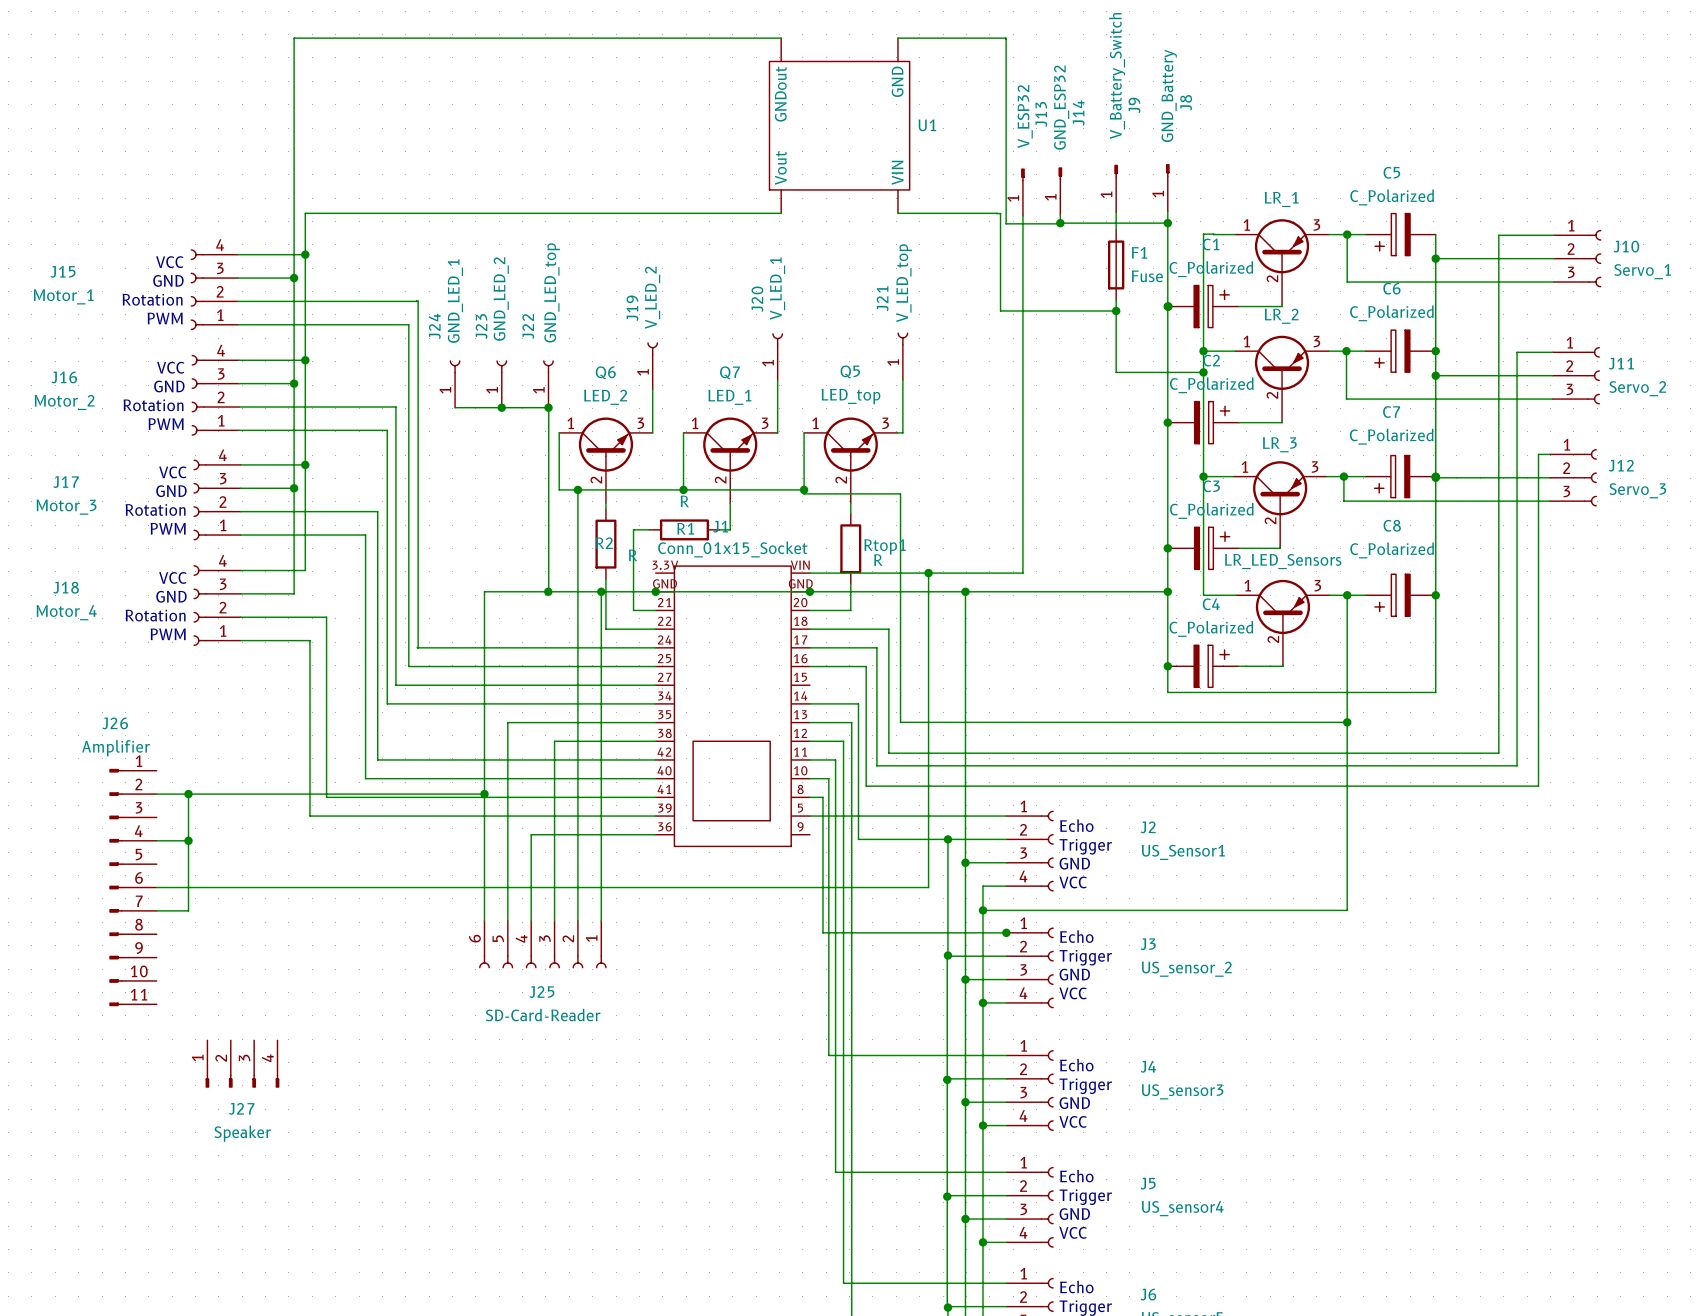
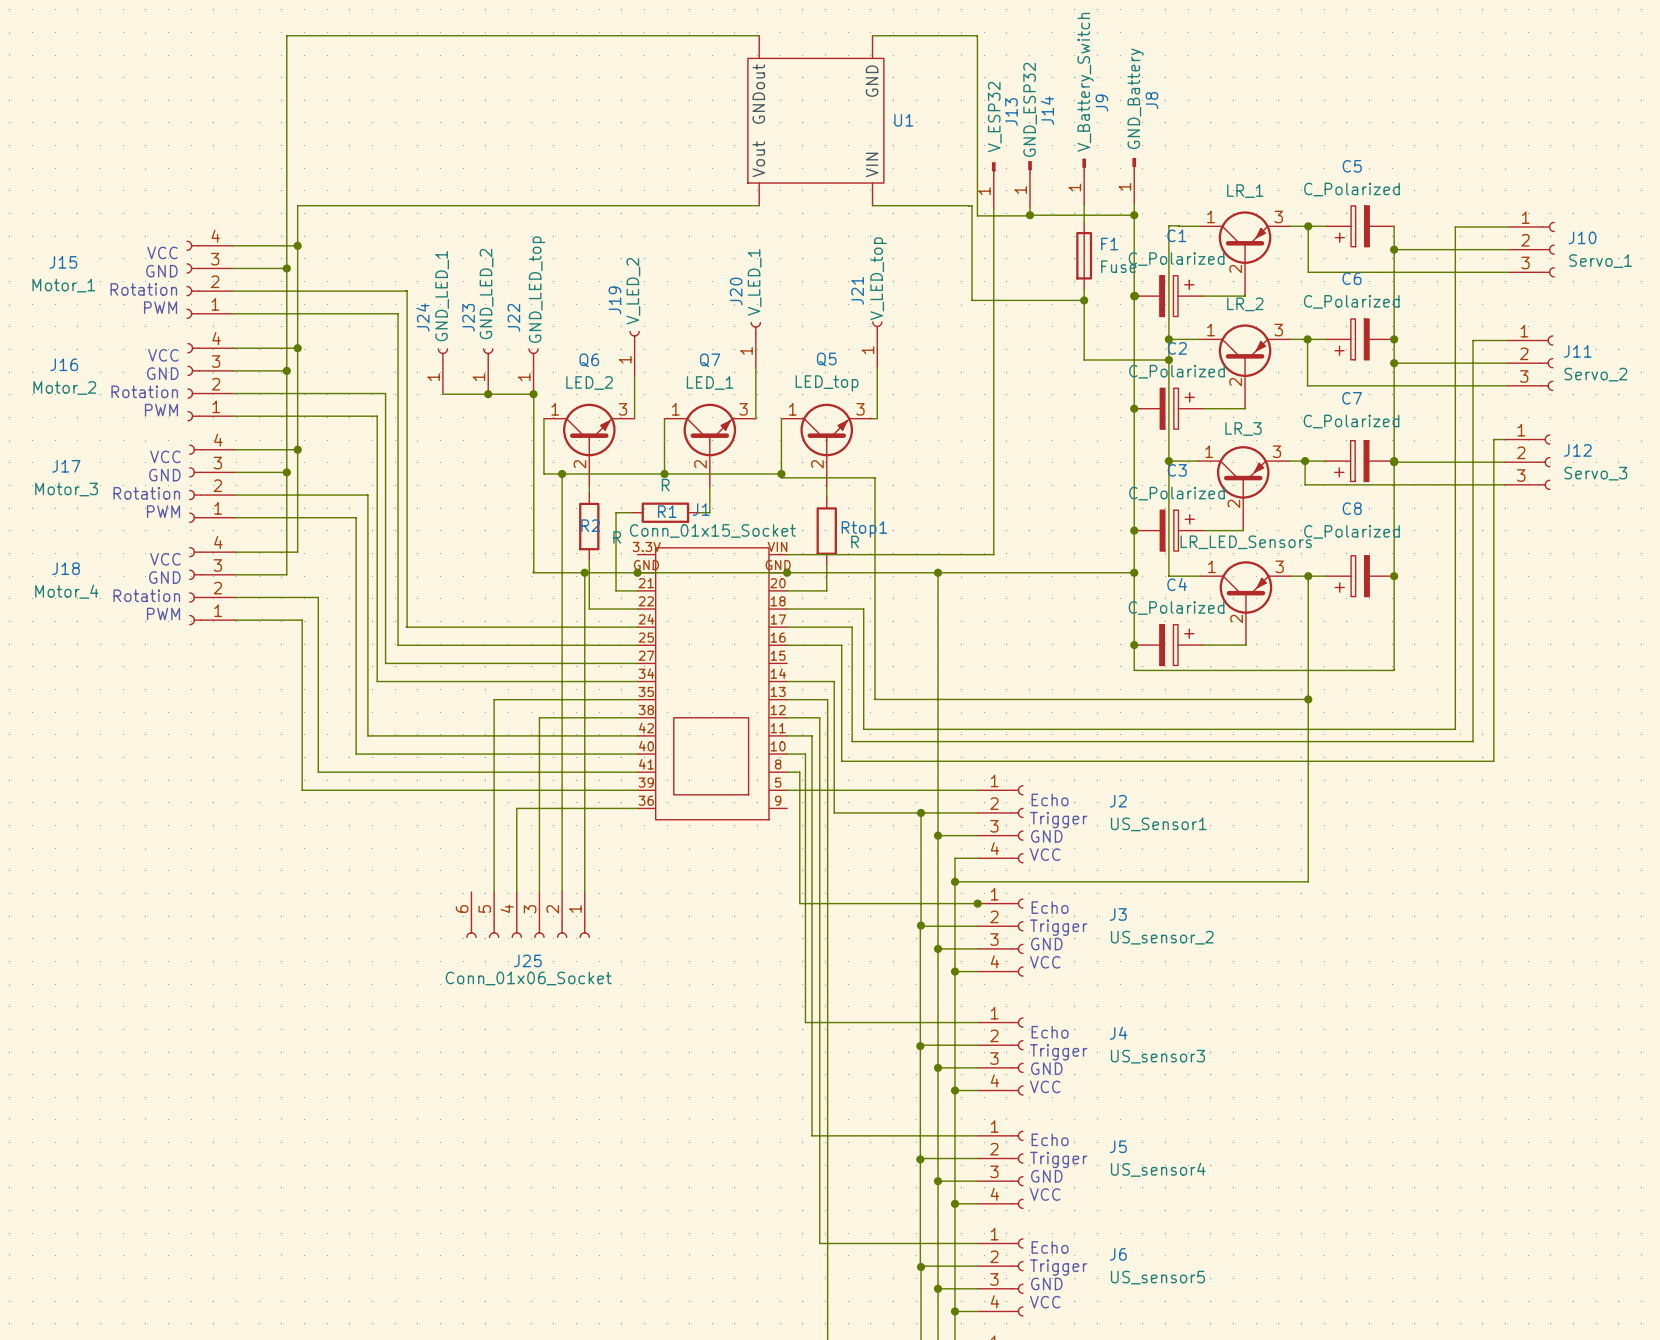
wire: (928, 573) (928, 887) (156, 887) -> none
junction: (928, 573) -> none
wire: (548, 591) (484, 591) (484, 920) -> none
junction: (548, 591) -> none
wire: (156, 794) (484, 794) -> none
wire: (188, 794) (188, 910) (156, 910) -> none
junction: (188, 794) -> none
junction: (484, 794) -> none
wire: (156, 840) (188, 840) -> none
junction: (188, 840) -> none
J26: Amplifier (133, 887) -> none
J25 value: SD-Card-Reader (543, 1015) -> Conn_01x06_Socket (528, 978)
J27: Speaker (242, 1064) -> none

